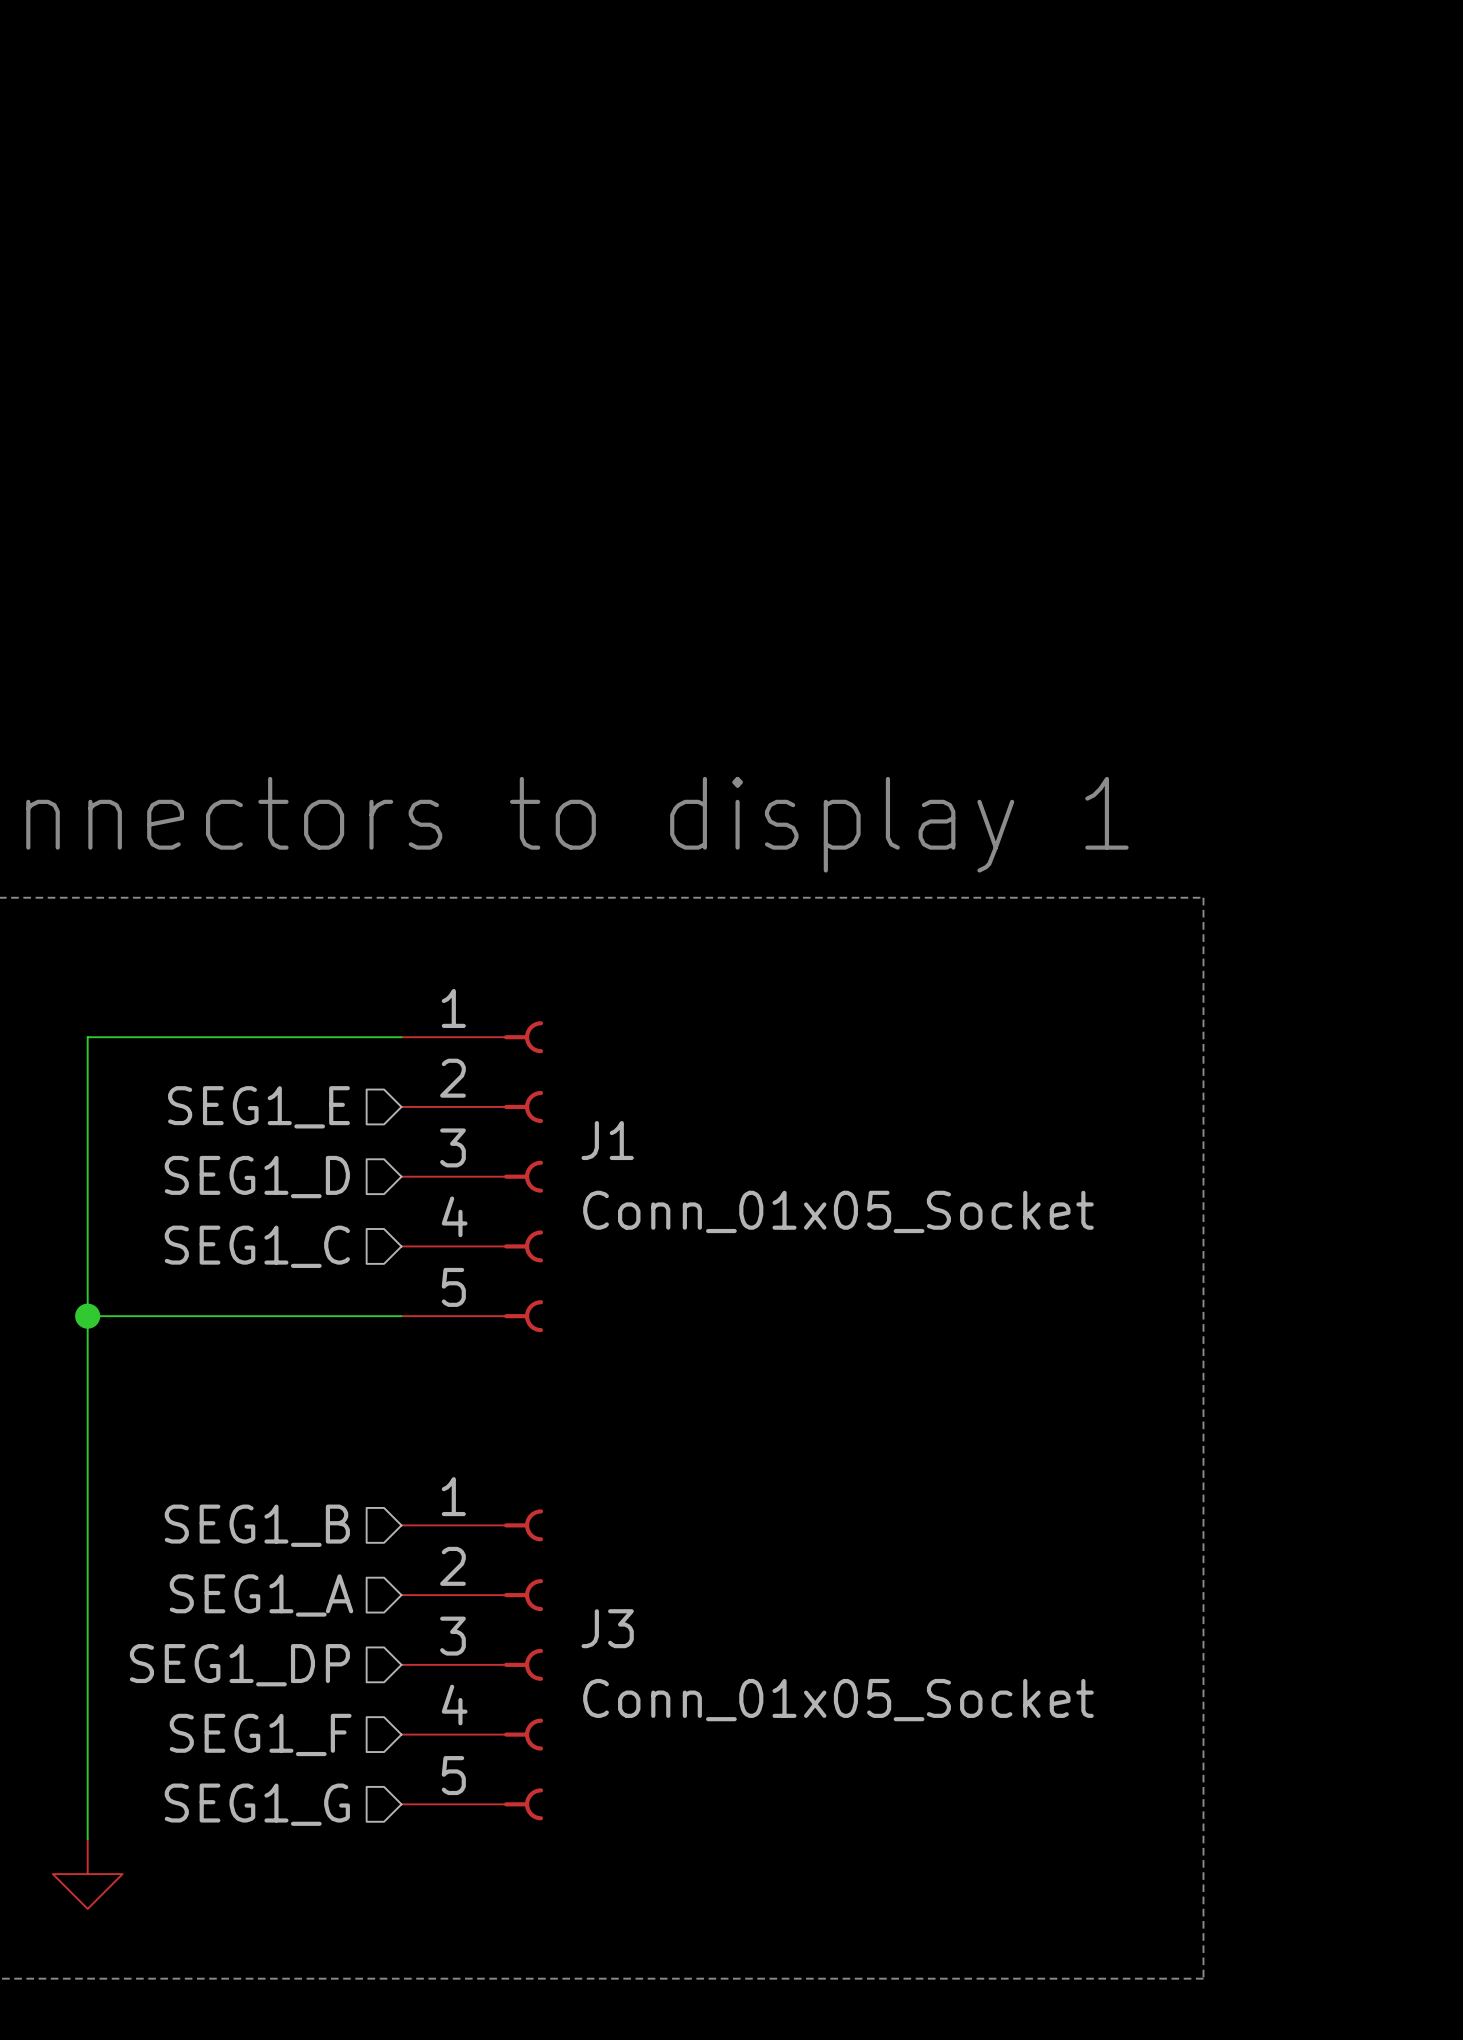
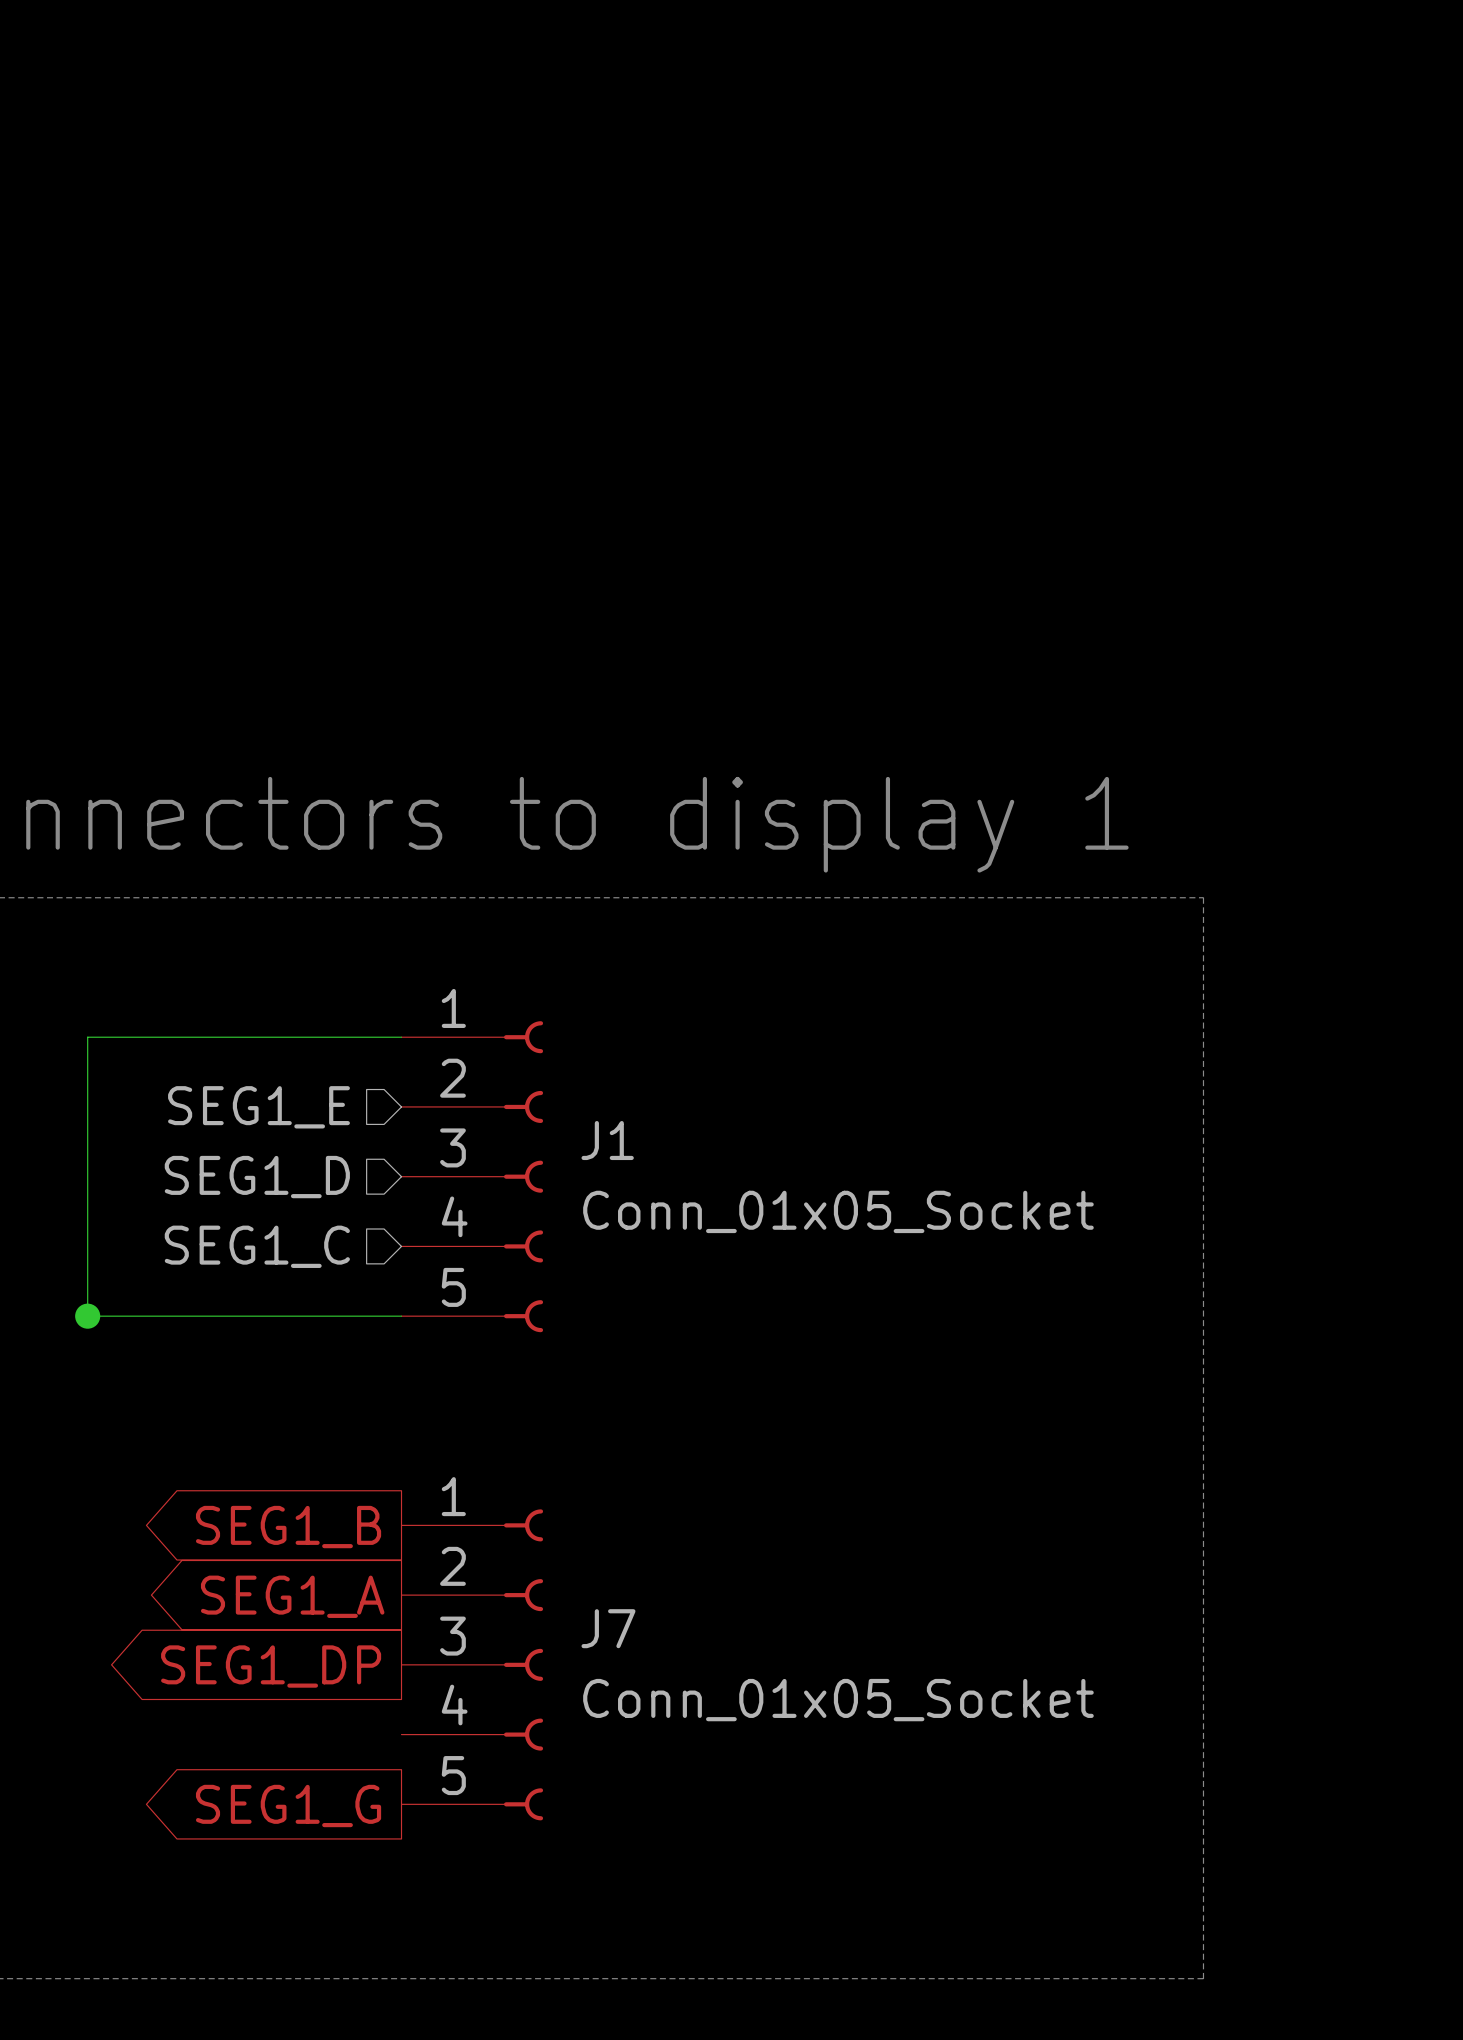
wire: (87, 1316) (87, 1839) -> none
hierarchical label: SEG1_B (257, 1525) -> none
global label: none -> SEG1_B (288, 1527)
hierarchical label: SEG1_A (261, 1595) -> none
global label: none -> SEG1_A (292, 1596)
J3 name: J3 (607, 1628) -> J7 (608, 1628)
hierarchical label: SEG1_DP (239, 1665) -> none
global label: none -> SEG1_DP (271, 1666)
hierarchical label: SEG1_F (260, 1734) -> none
hierarchical label: SEG1_G (257, 1804) -> none
global label: none -> SEG1_G (288, 1805)
power symbol: (87, 1874) -> none

